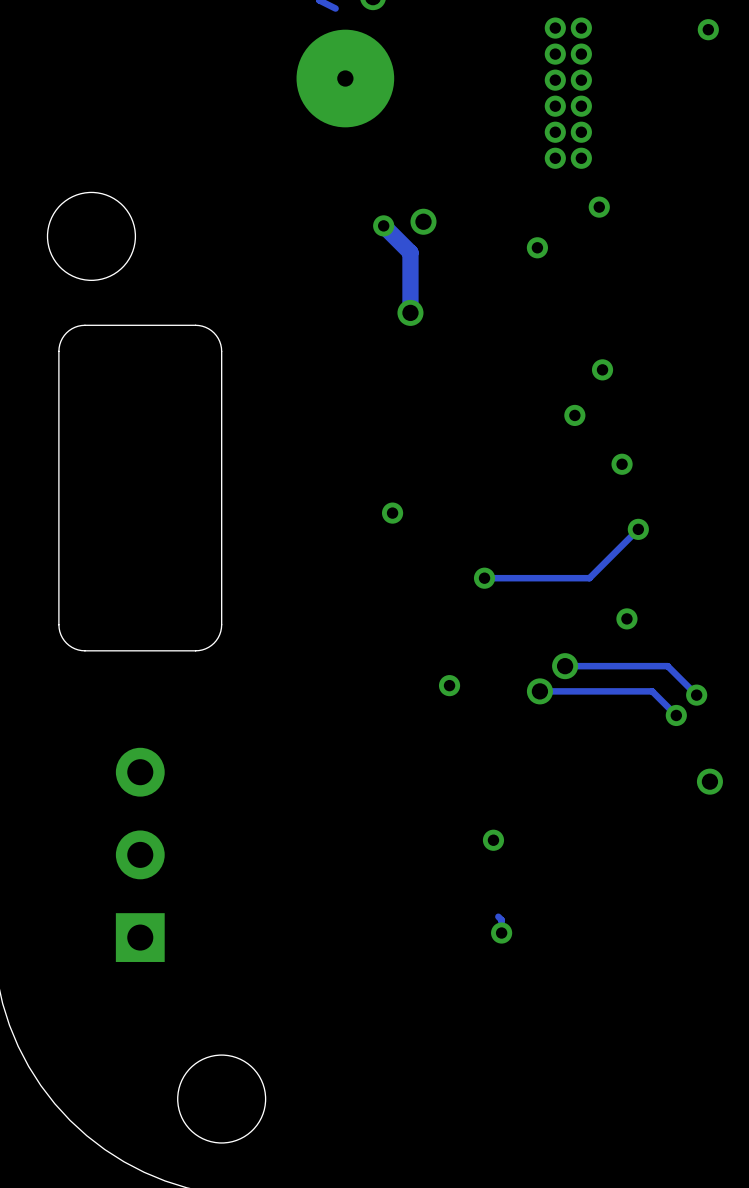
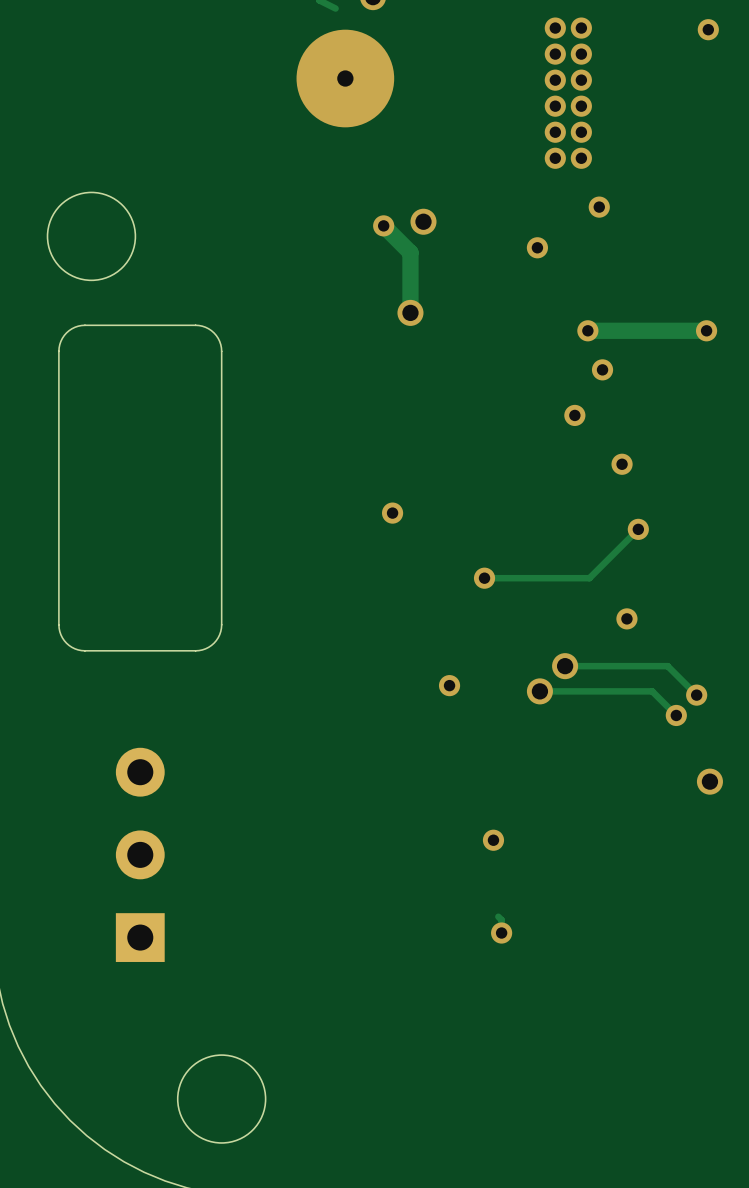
via: none -> (587, 330)
track: none -> (706, 330) (587, 330)
via: none -> (706, 330)

